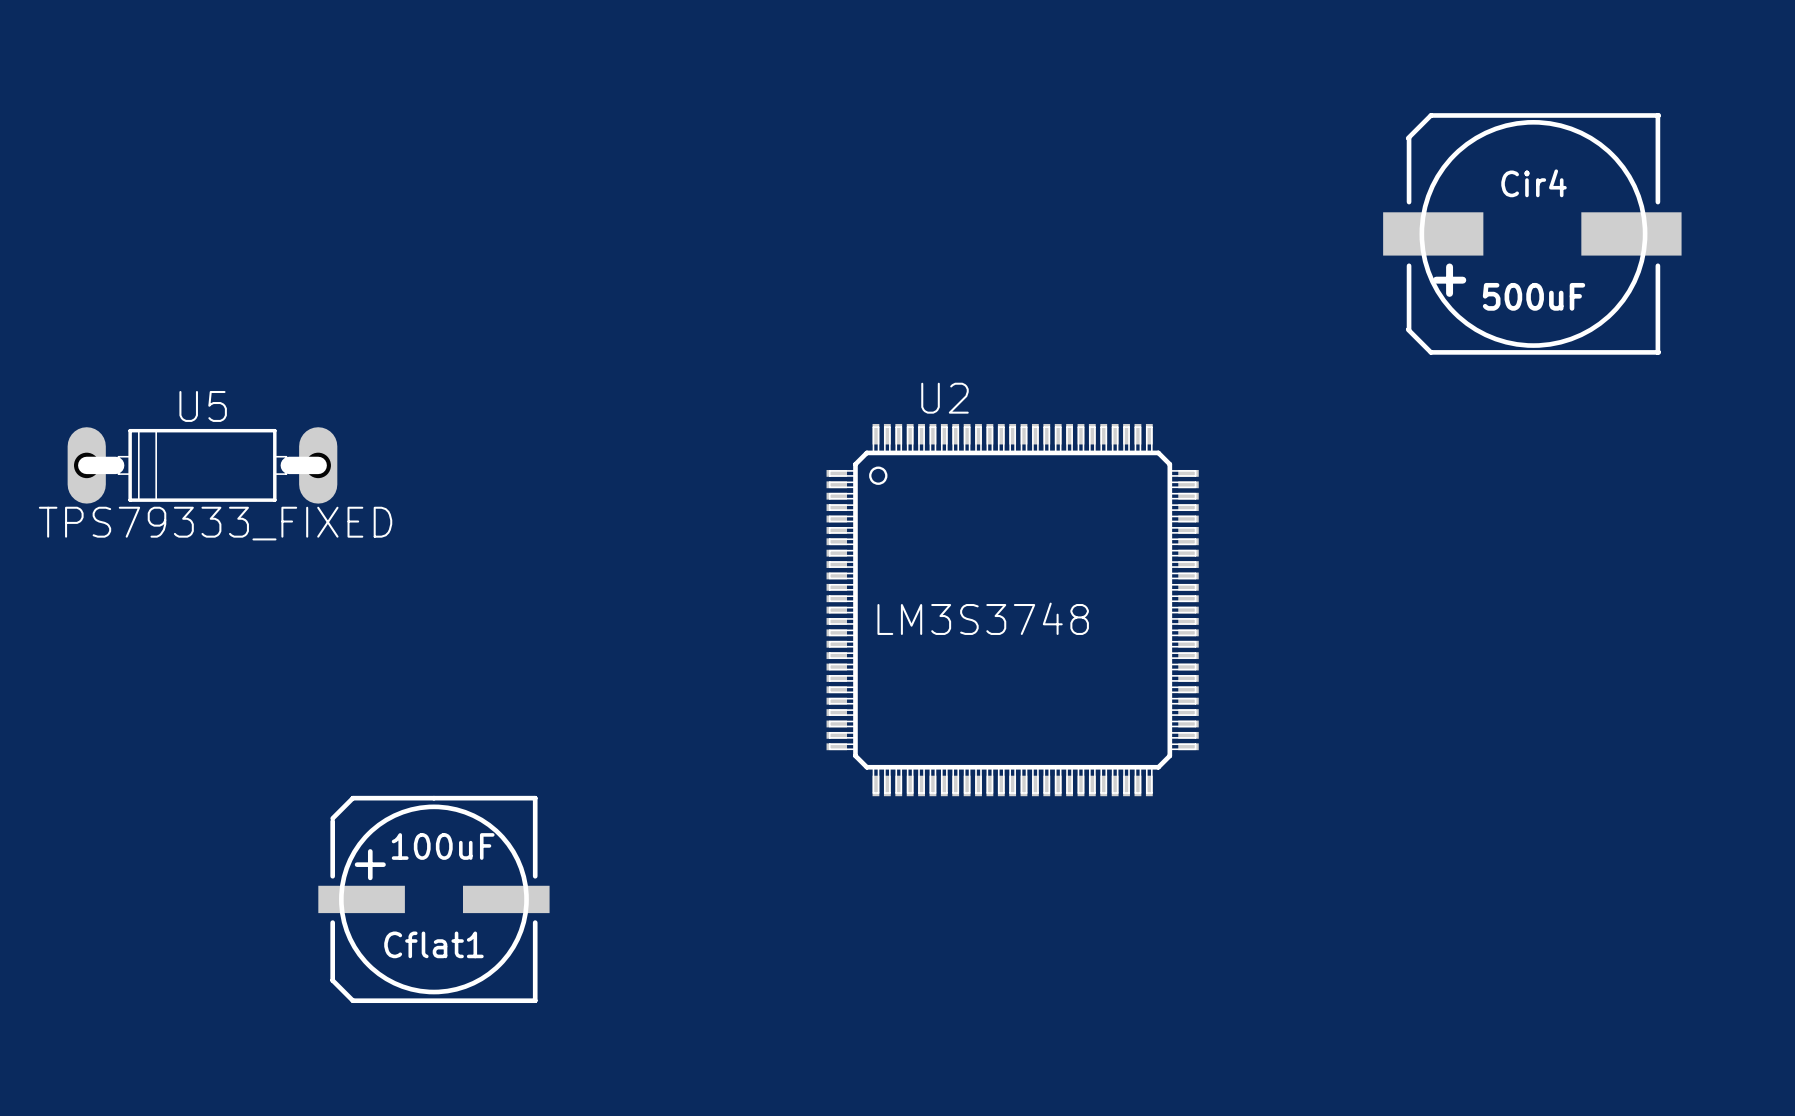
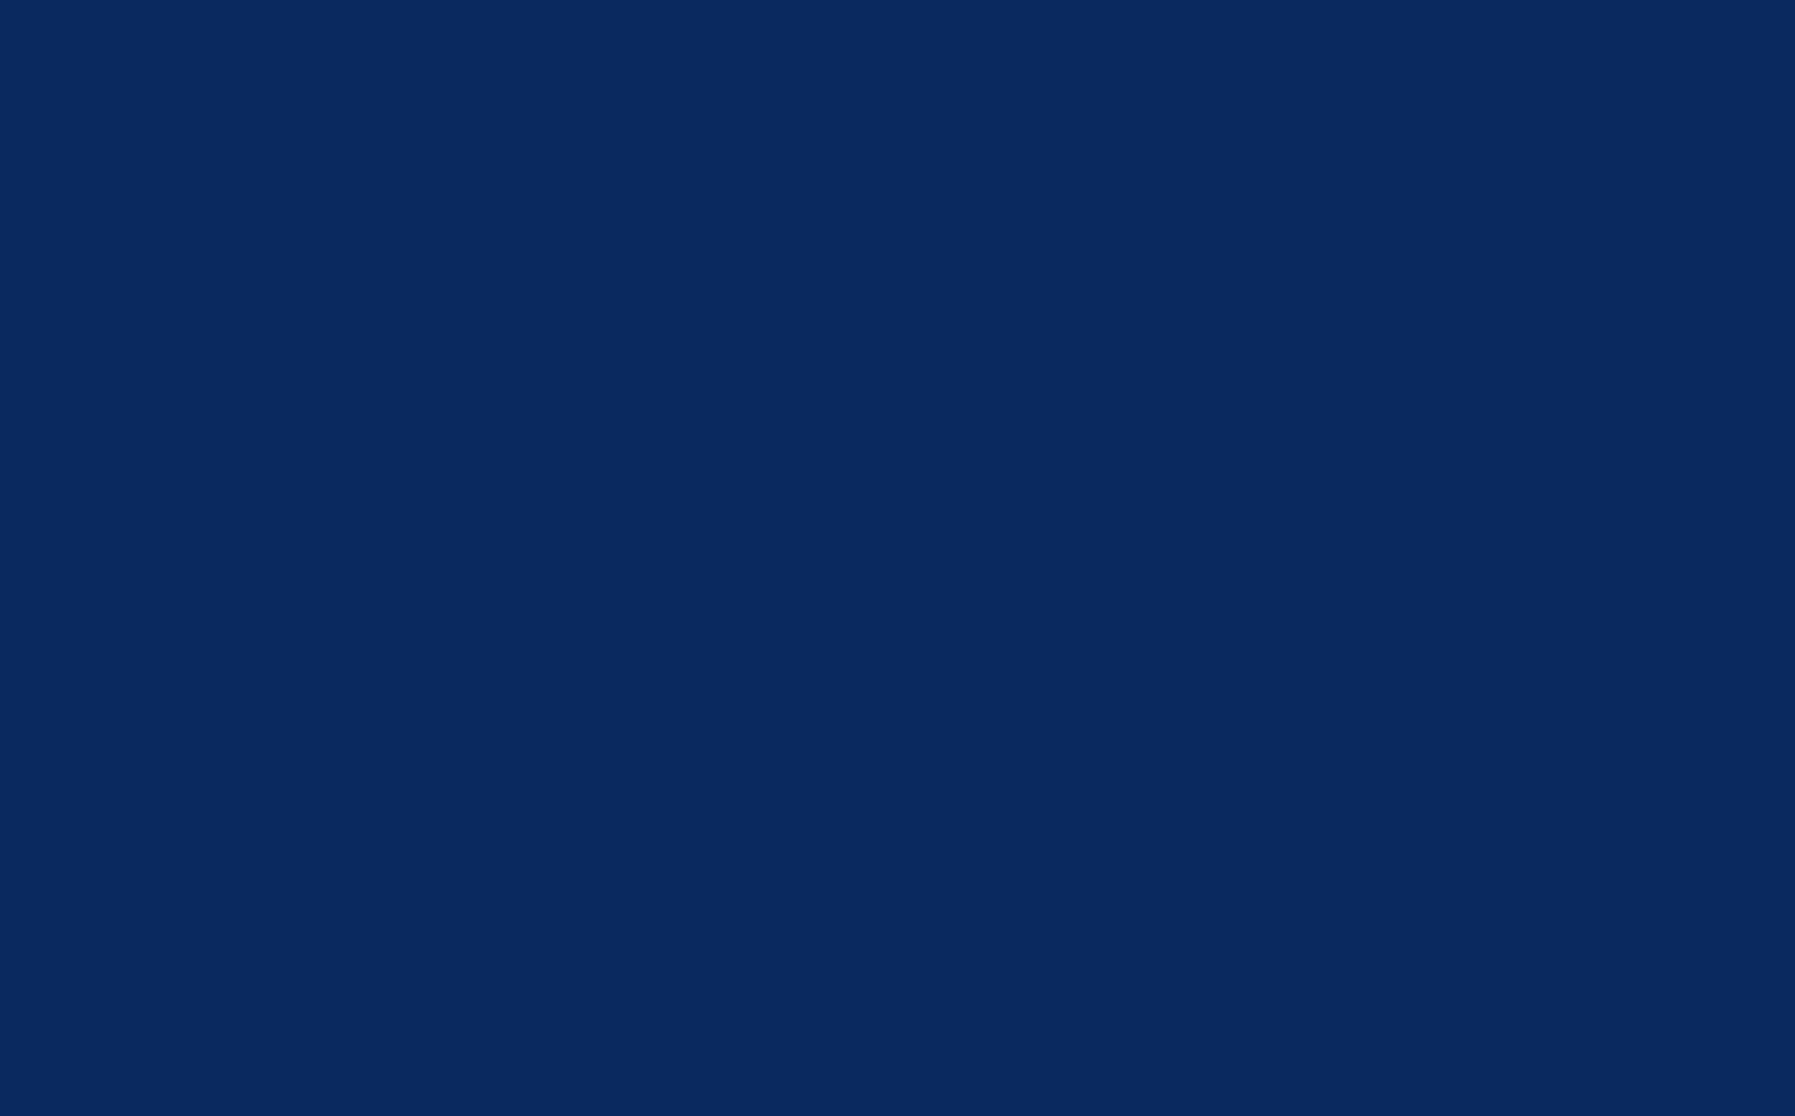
Cir4: 500uF (1532, 233) -> none
U5: TPS79333_FIXED (202, 465) -> none
U2: LM3S3748 (1012, 610) -> none
Cflat1: 100uF (433, 899) -> none

